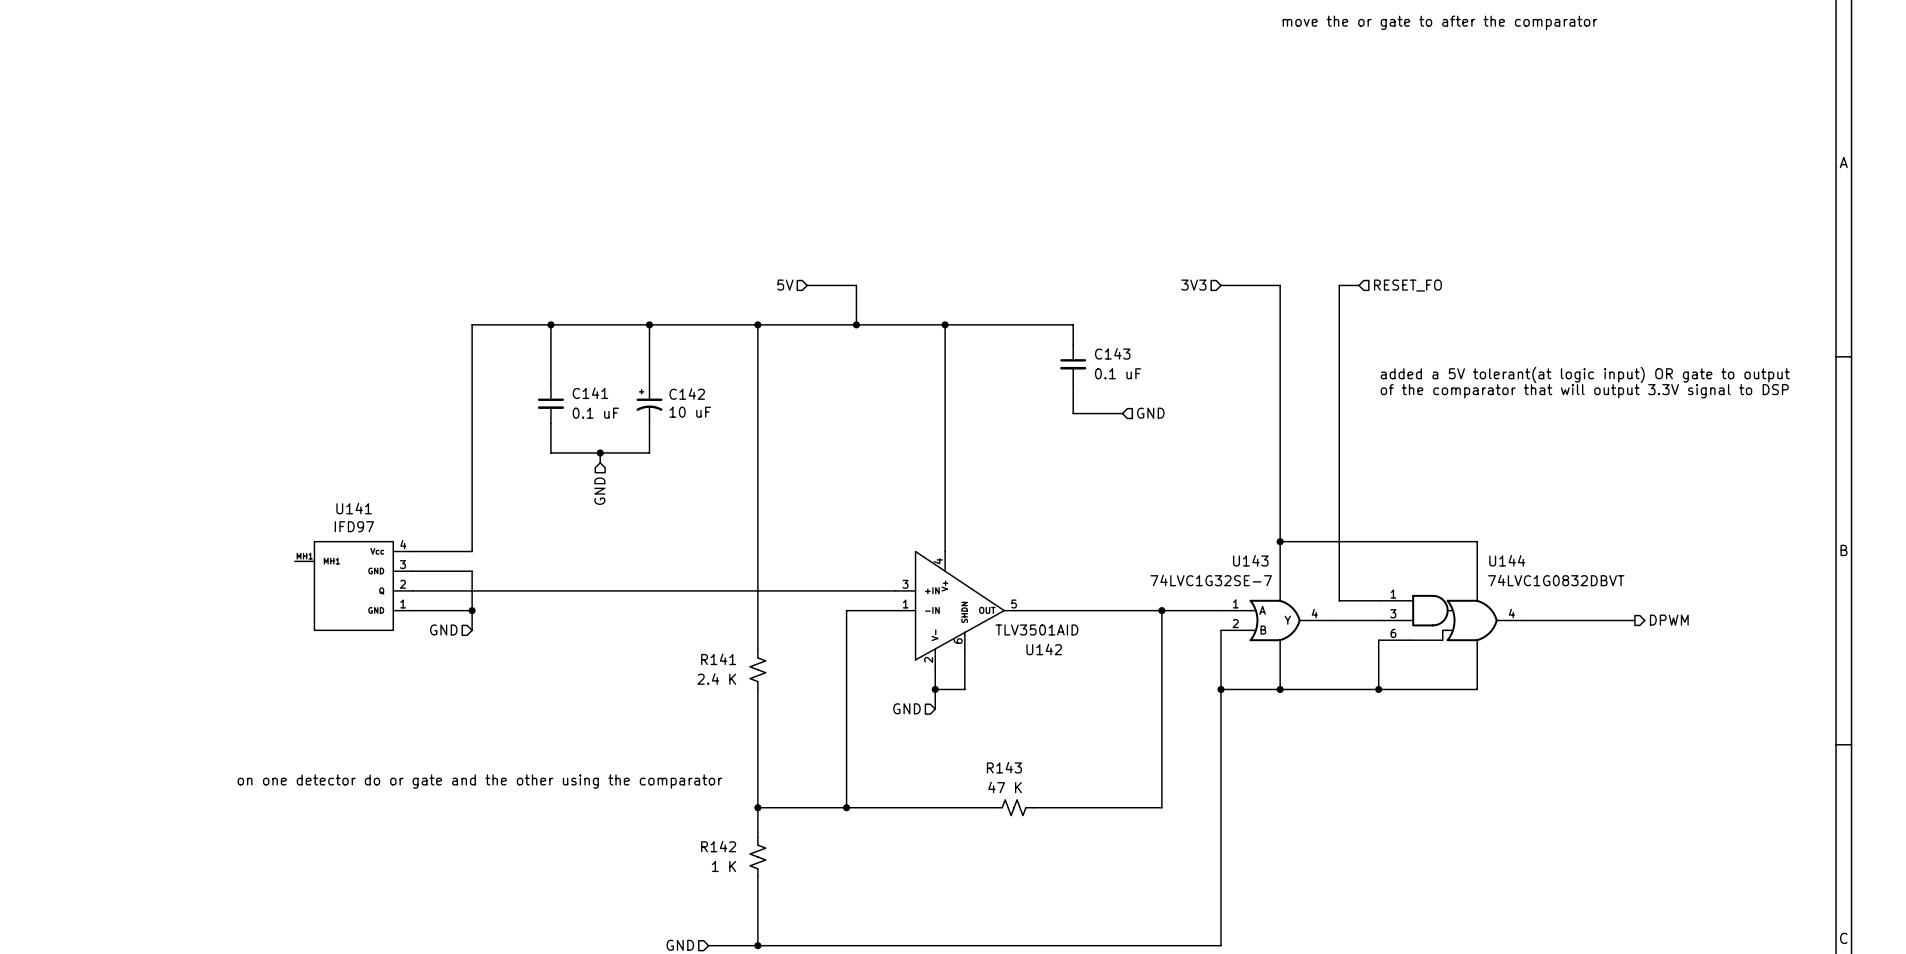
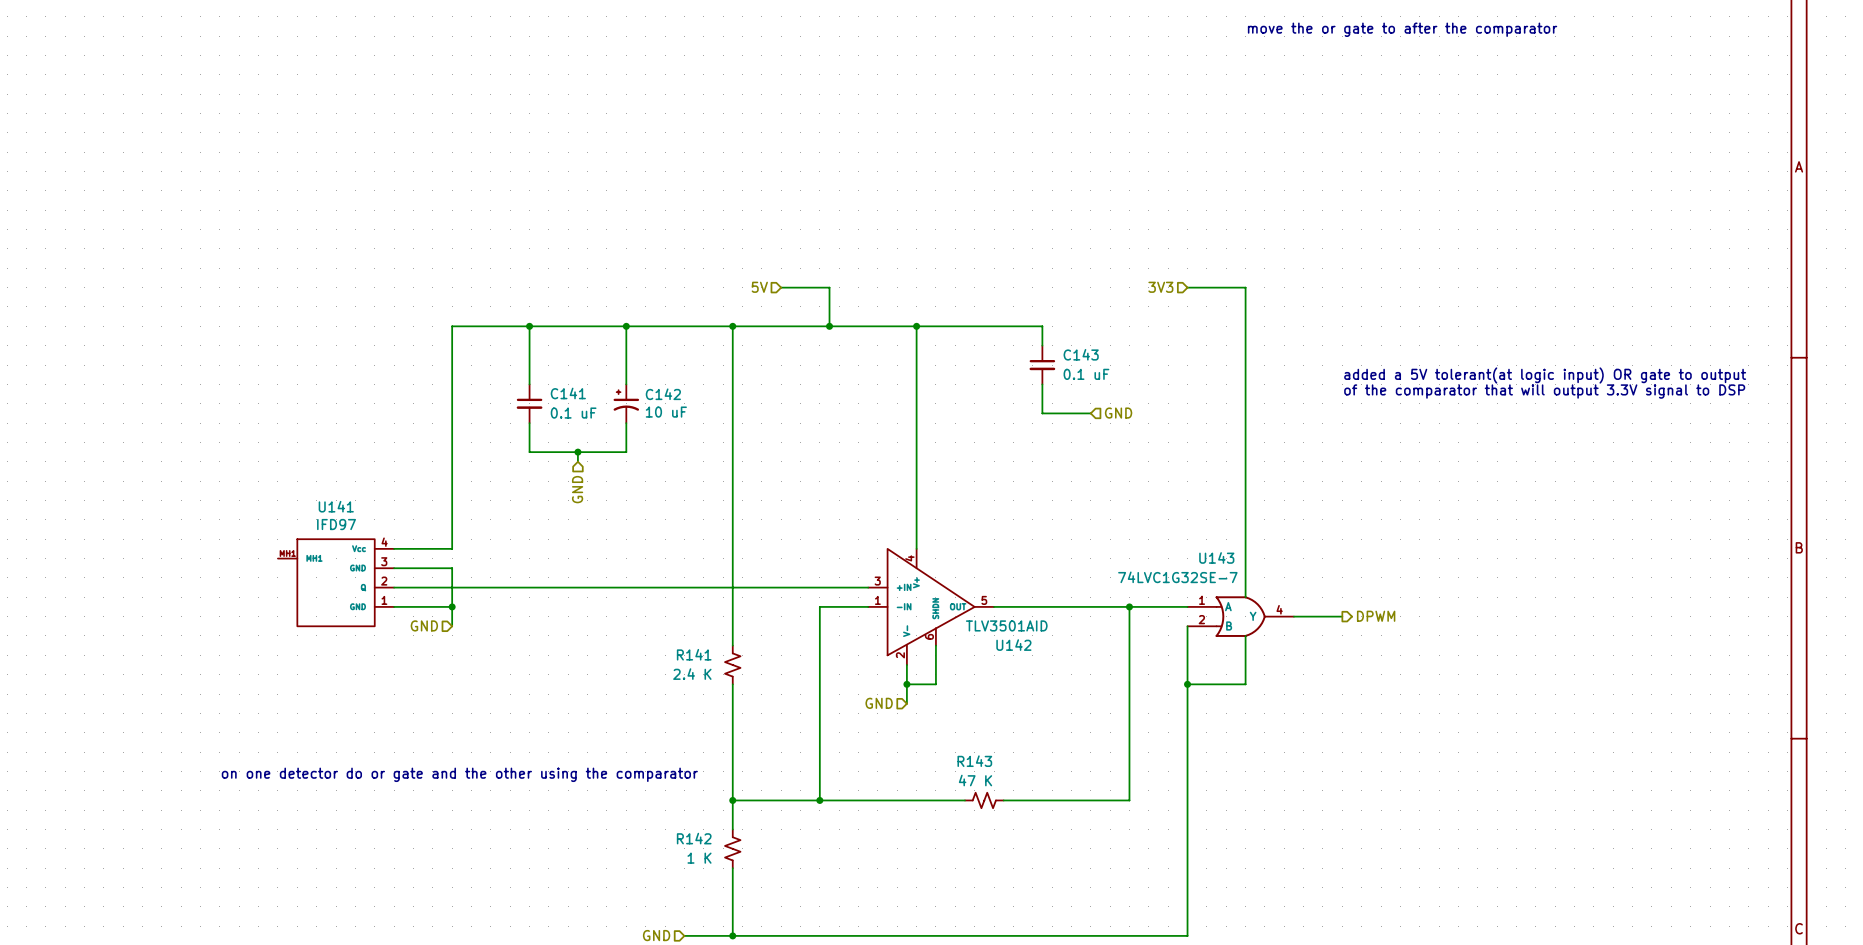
wire: (1358, 285) (1339, 285) (1339, 600) (1378, 600) -> none
hierarchical label: RESET_FO (1407, 285) -> none
wire: (1280, 541) (1477, 541) (1477, 600) -> none
junction: (1280, 541) -> none
U144: 74LVC1G0832DBVT (1452, 618) -> none
hierarchical label: none -> DPWM (1376, 616)
wire: (1526, 620) (1634, 620) -> none
hierarchical label: DPWM (1669, 620) -> none
wire: (1378, 640) (1378, 689) -> none
wire: (1477, 640) (1477, 689) (1280, 689) -> none
junction: (1280, 689) -> none
junction: (1378, 689) -> none

